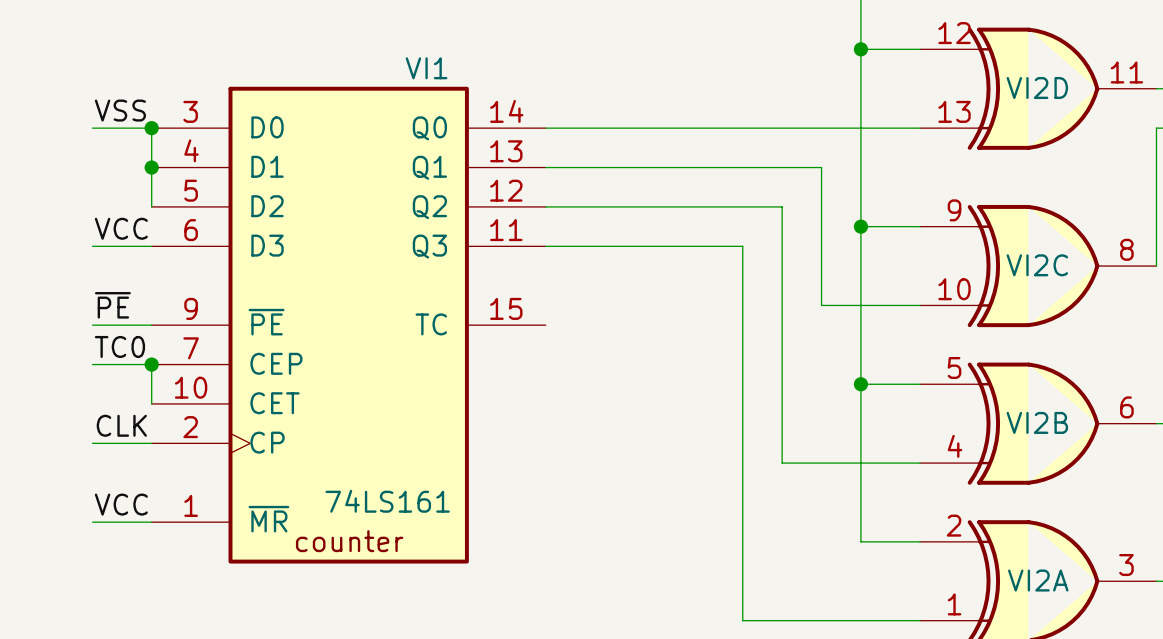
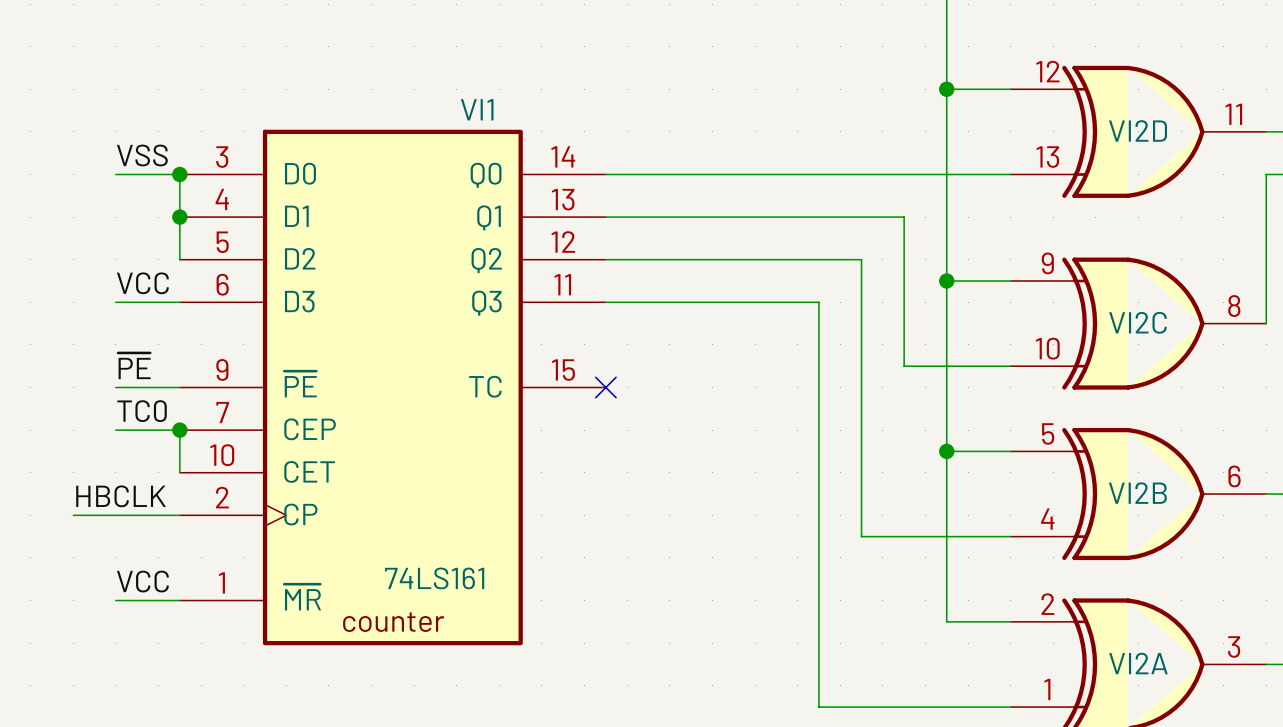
no-connect mark: none -> (605, 387)
label: CLK (121, 425) -> HBCLK (121, 496)
wire: none -> (73, 515) (115, 515)

